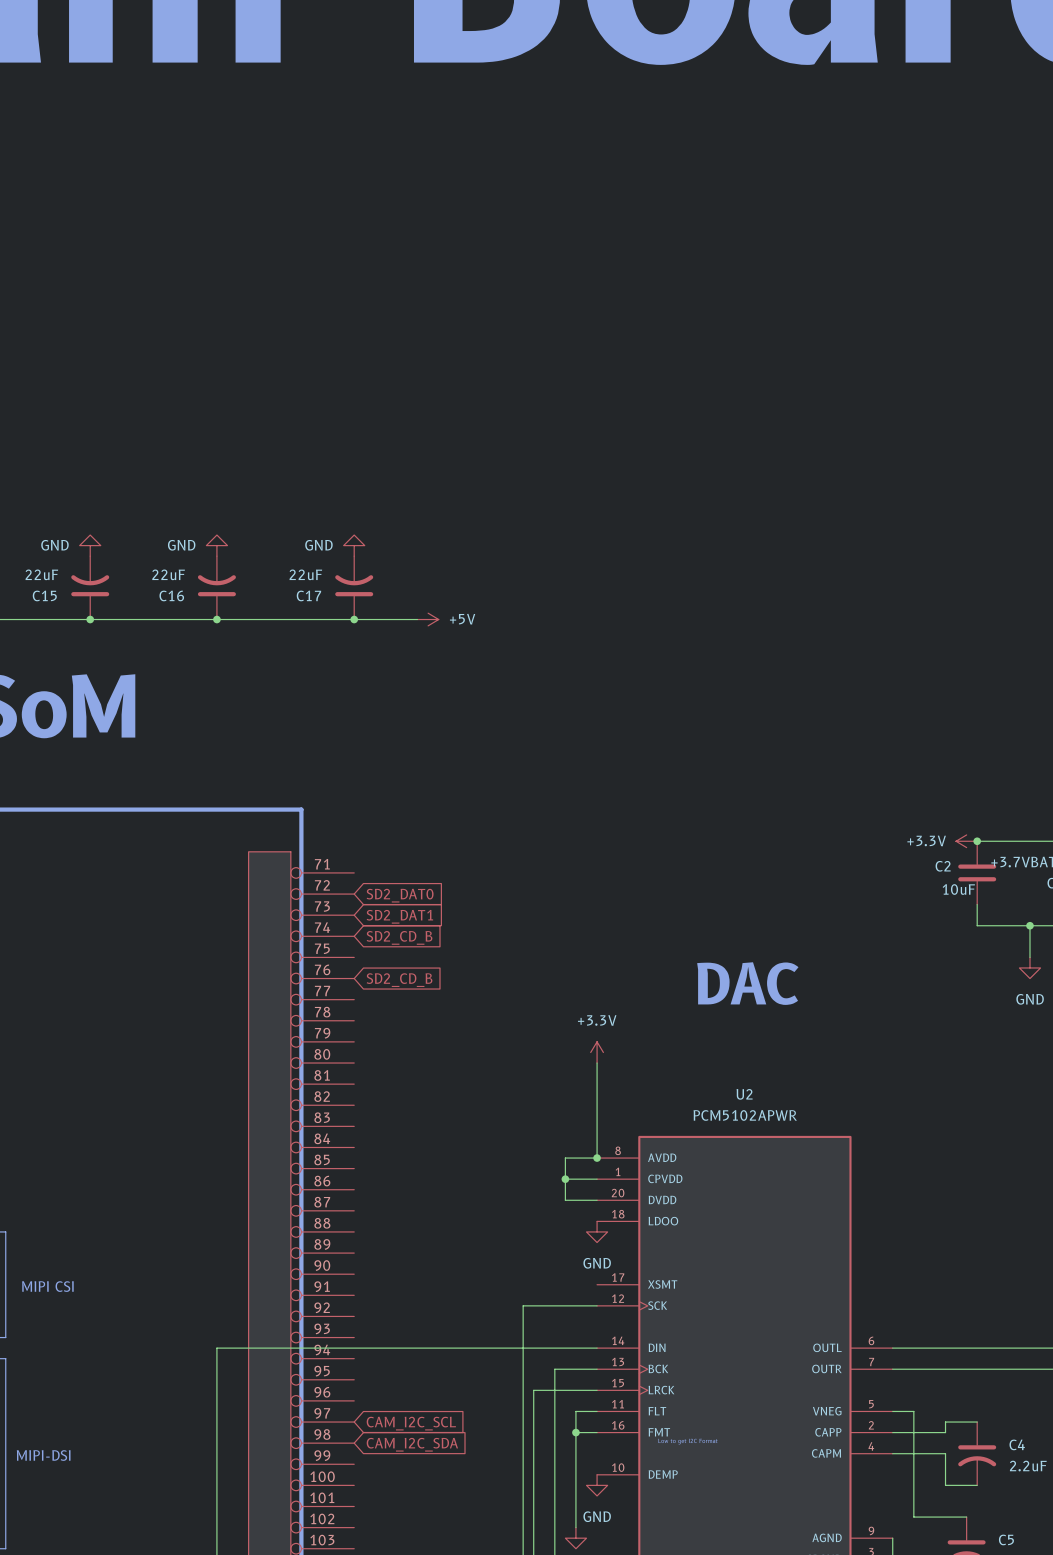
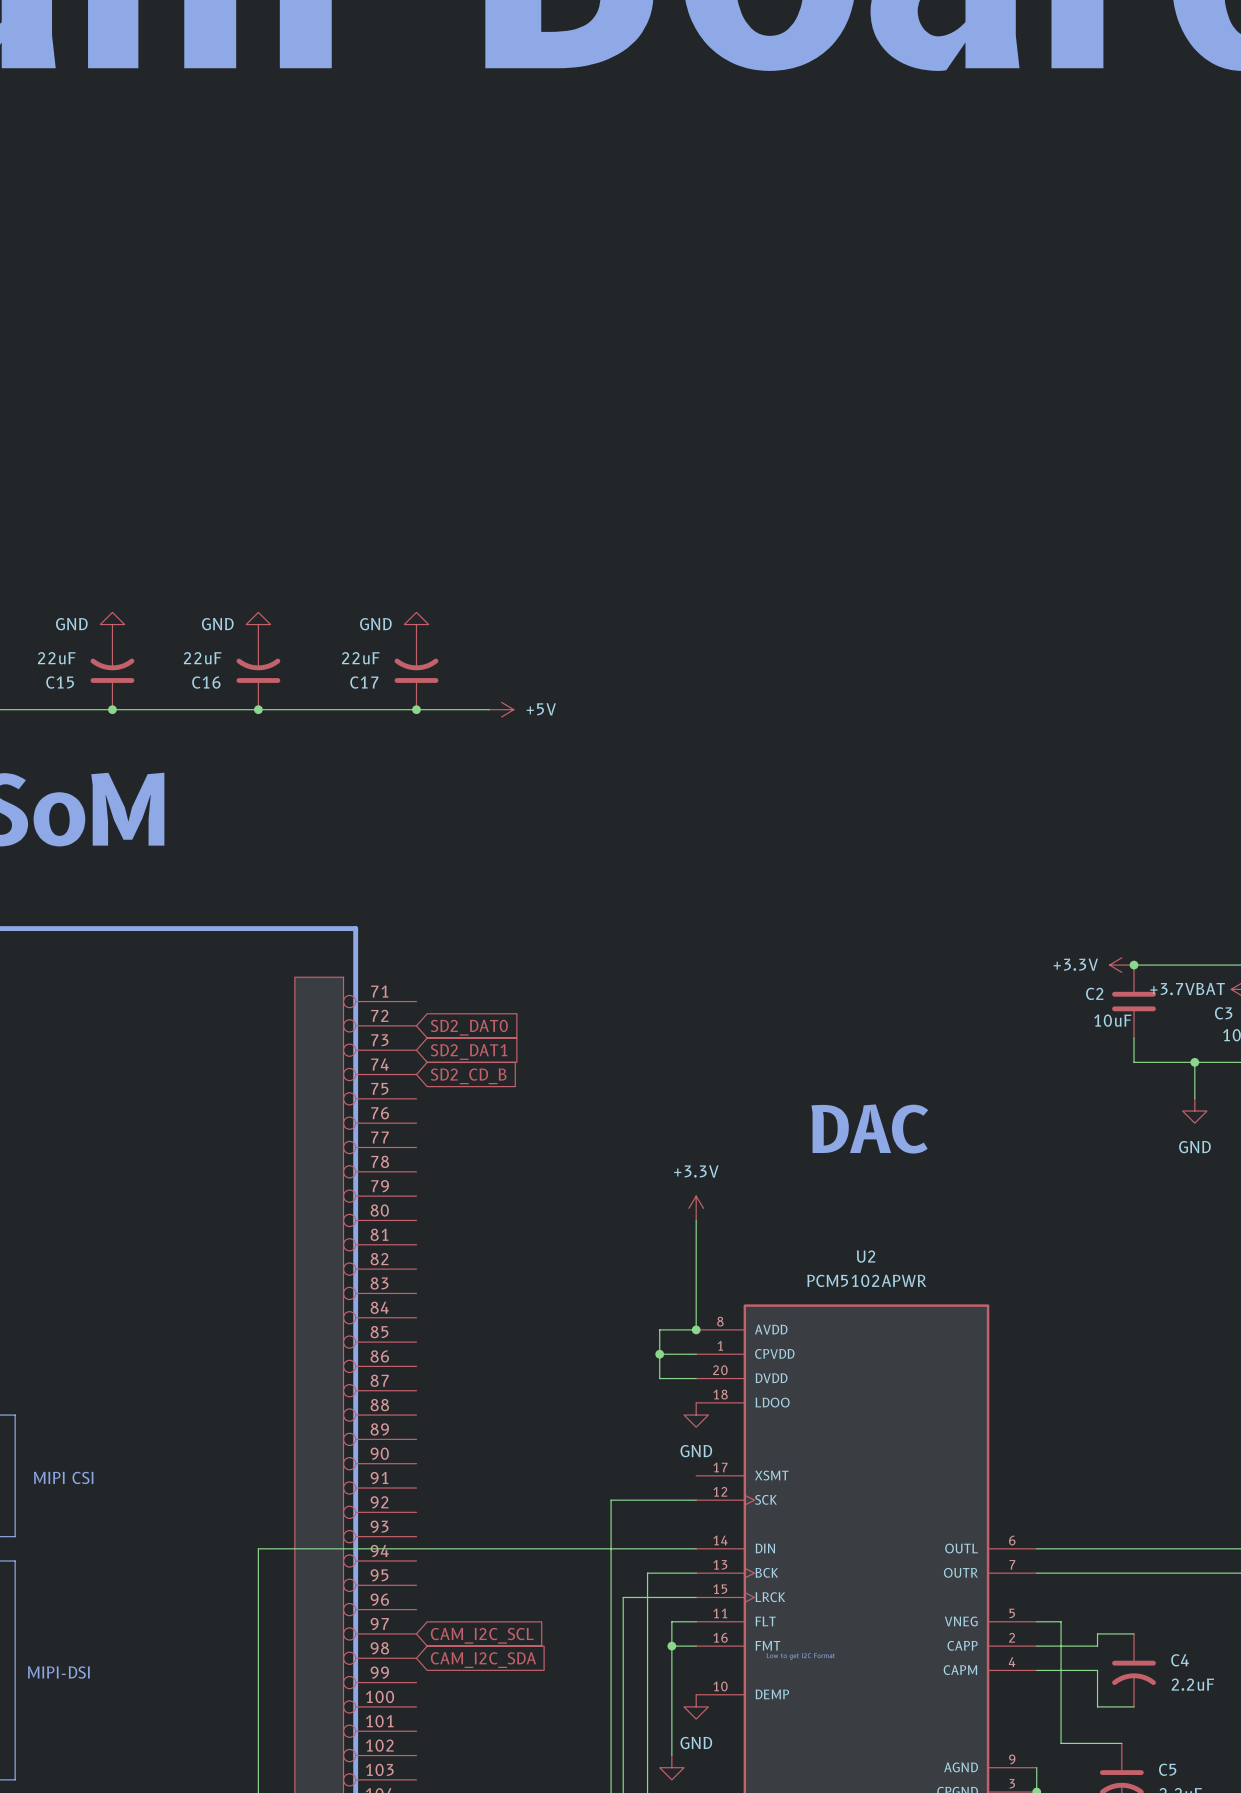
global label: SD2_CD_B (399, 980) -> none

